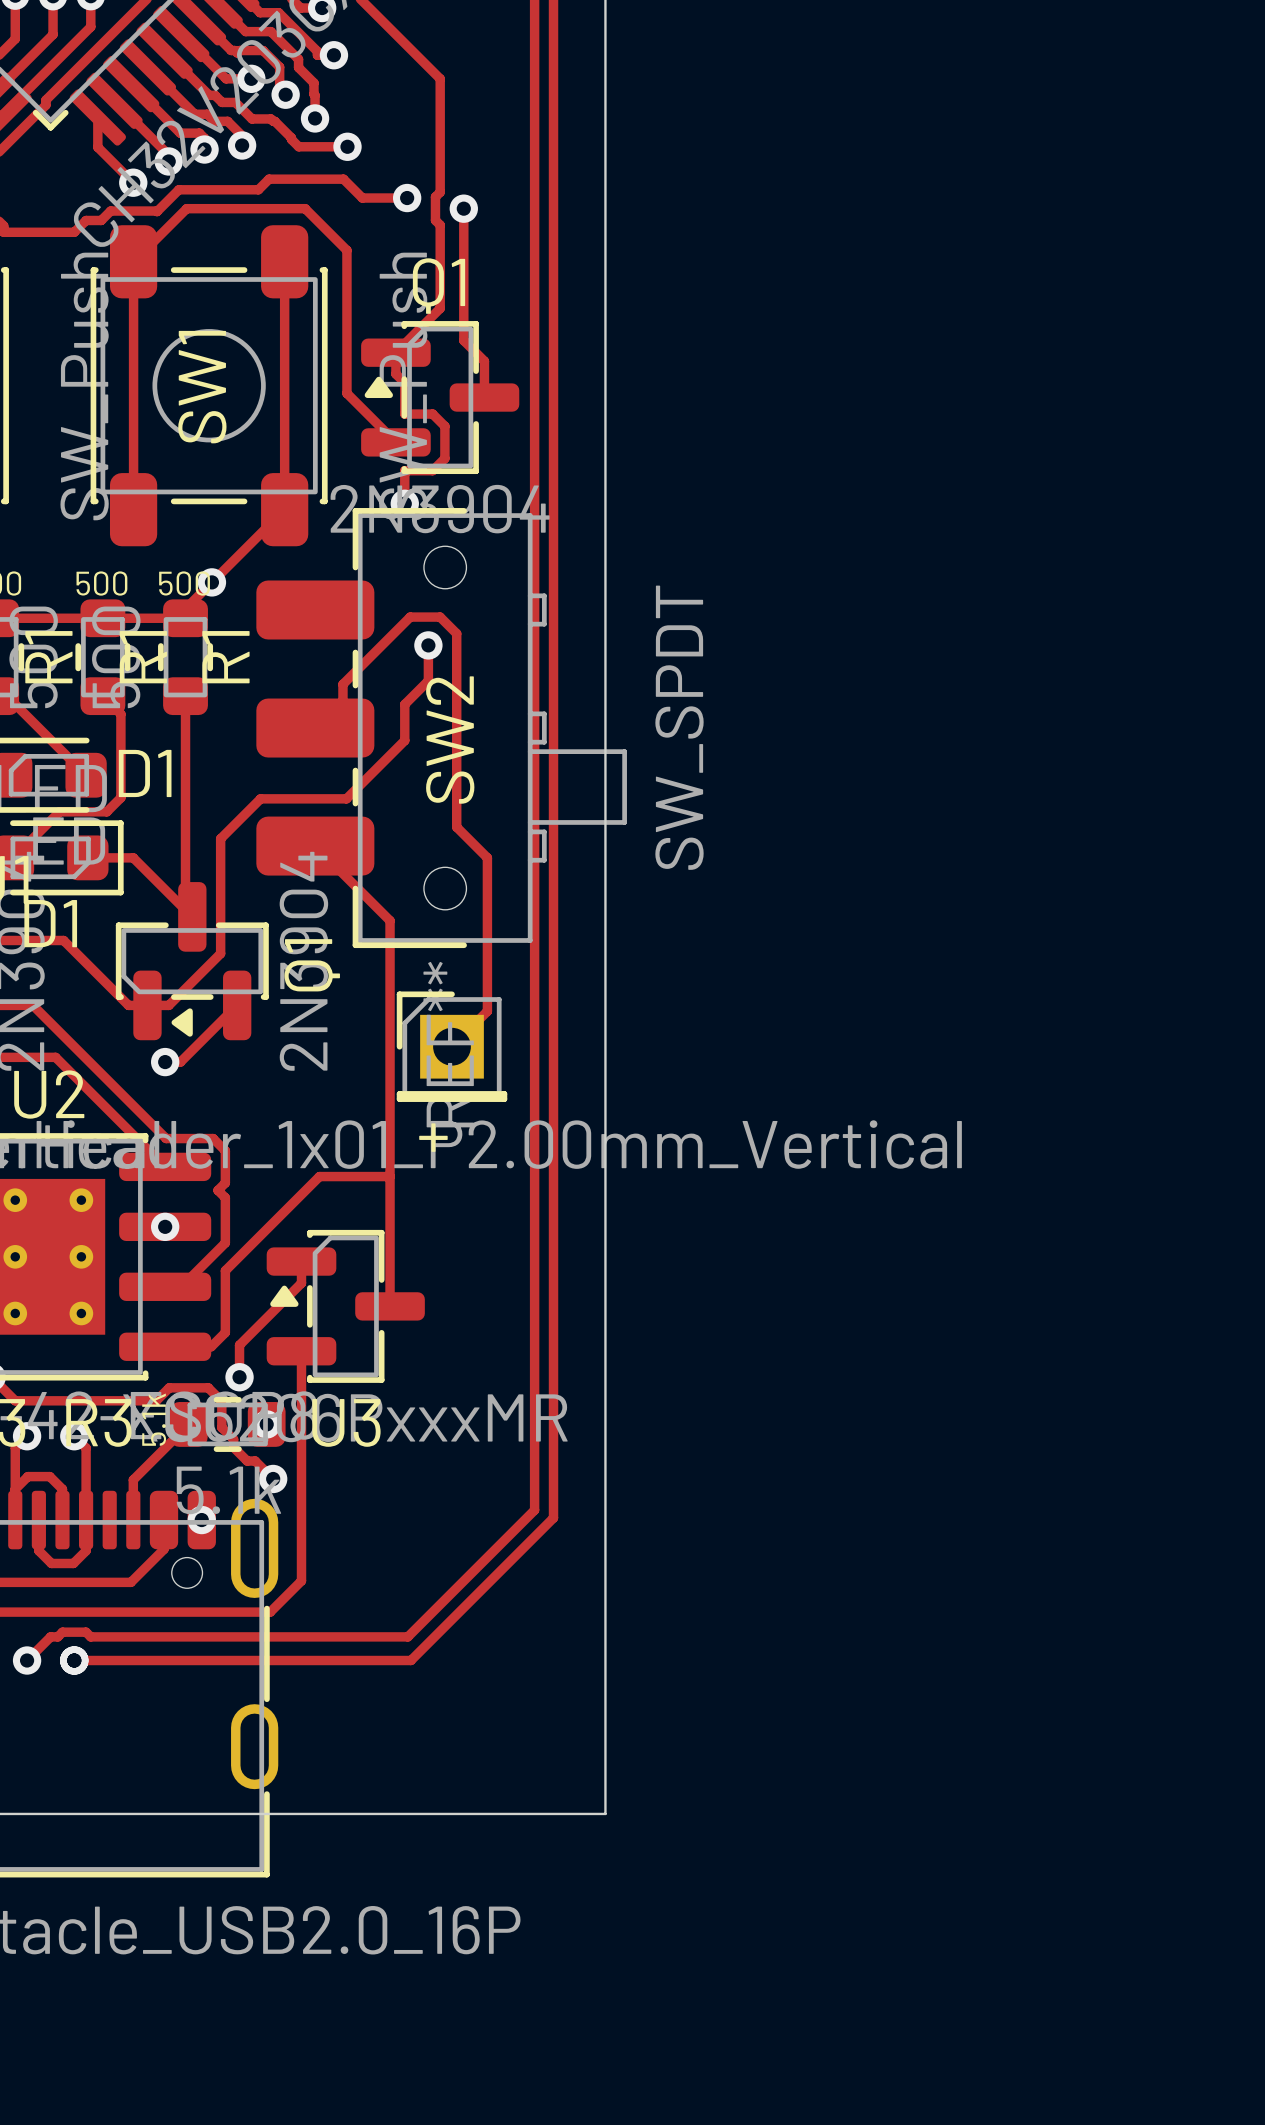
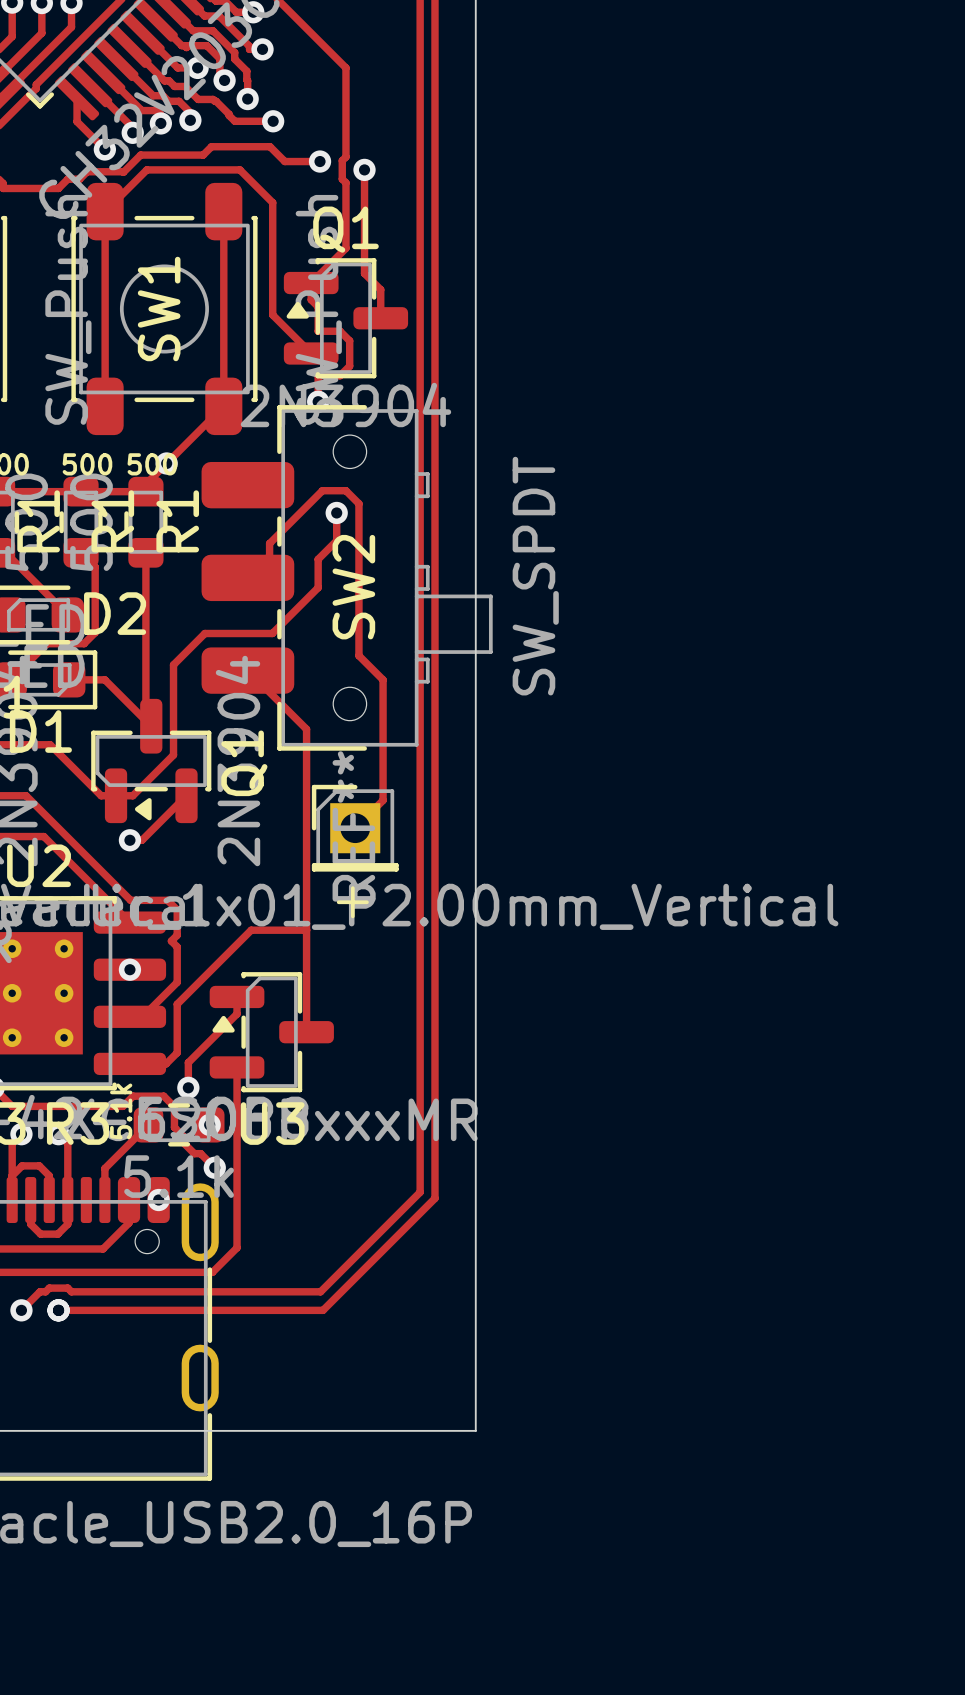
D1 name: D1 (145, 773) -> D2 (115, 613)

